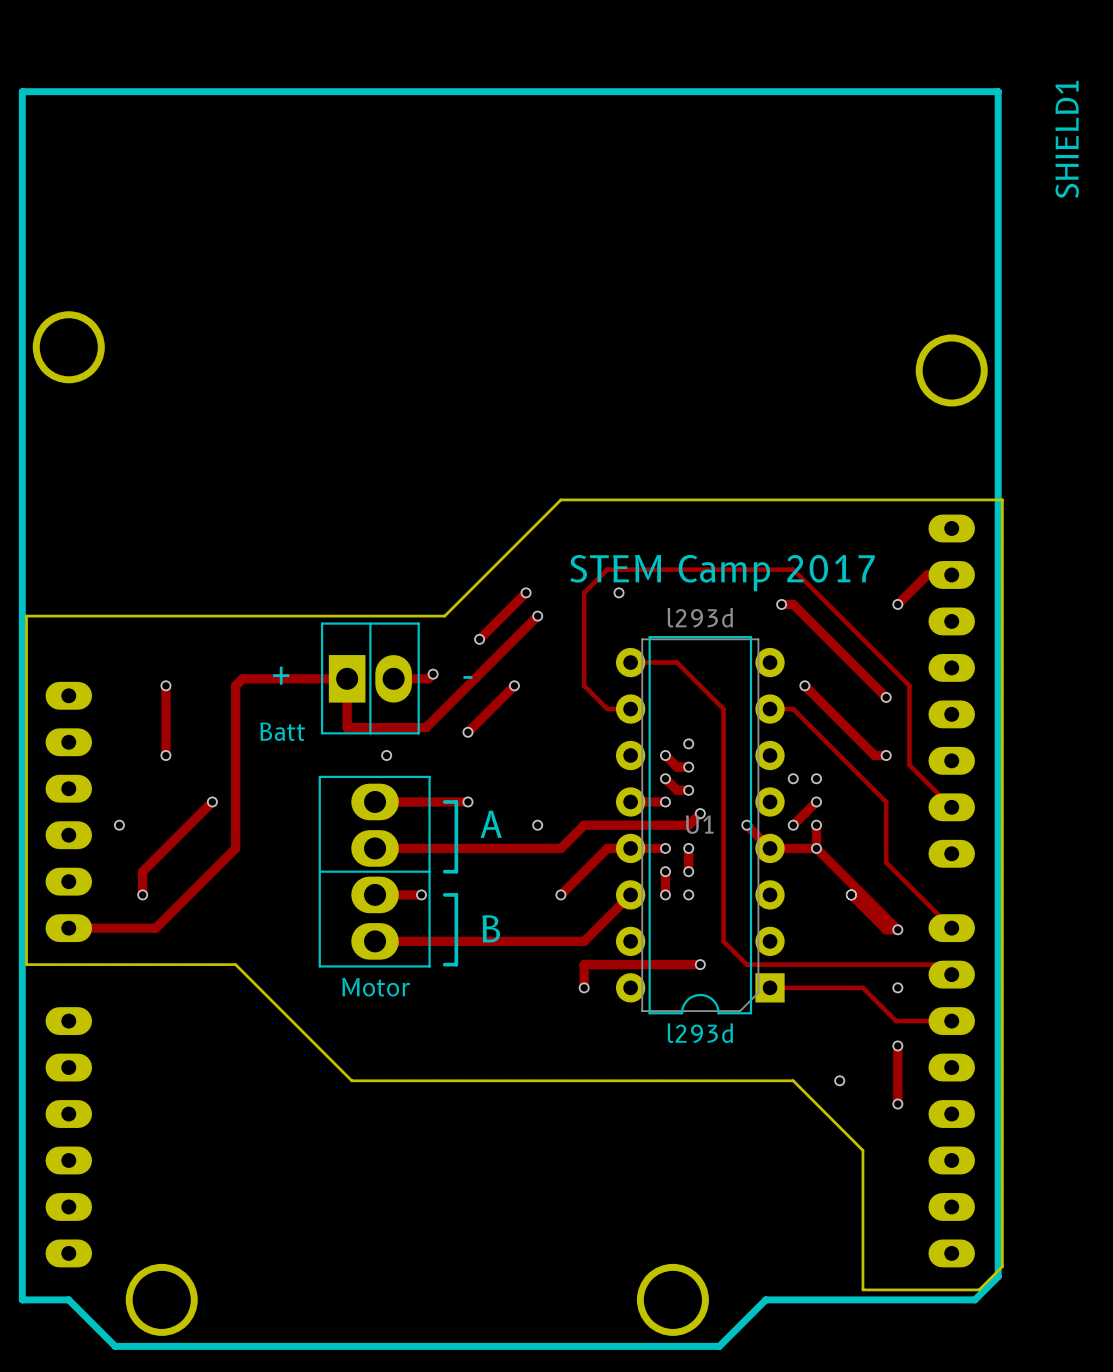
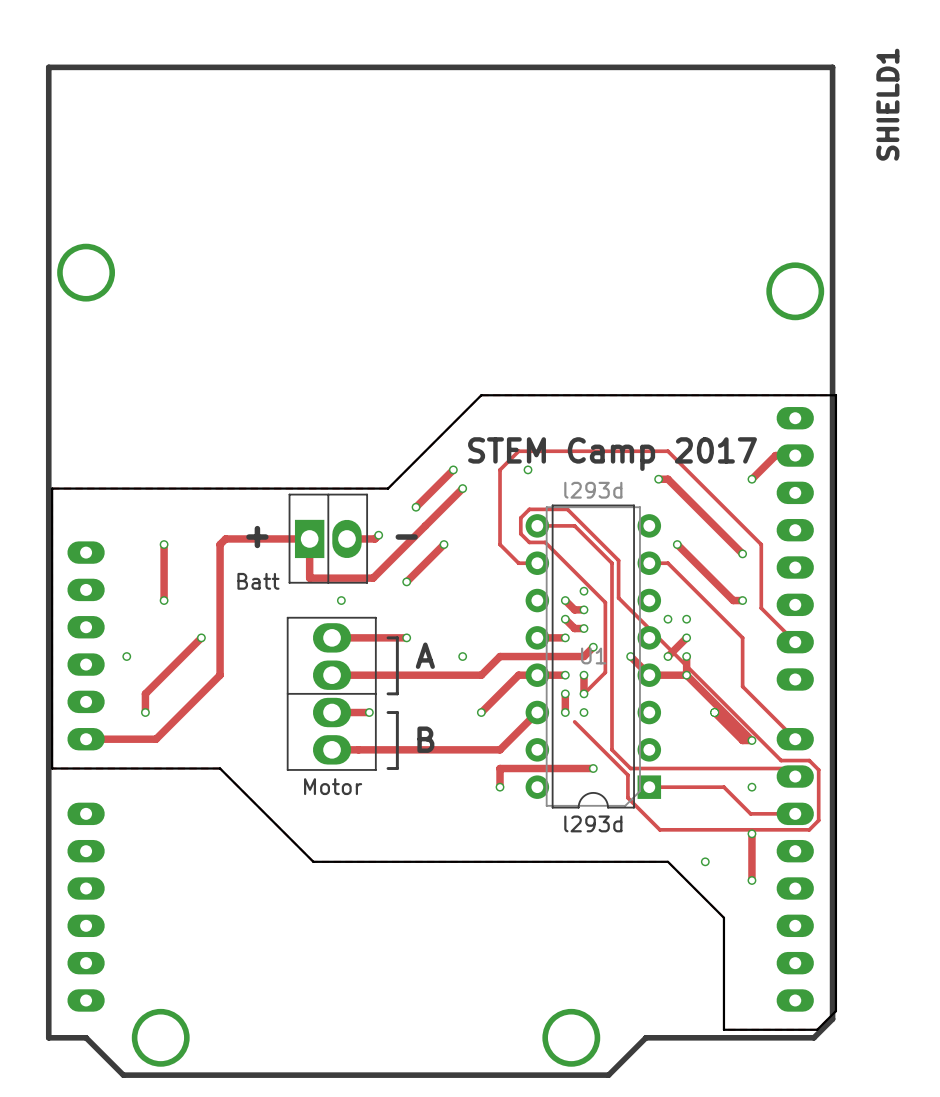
track: none -> (583, 693) (605, 672) (605, 602) (545, 542) (529, 542) (520, 533) (520, 517) (529, 509) (567, 509) (618, 560) (618, 597) (781, 760) (809, 760) (818, 769) (818, 820) (809, 829) (659, 829) (627, 797) (627, 775) (574, 721)

